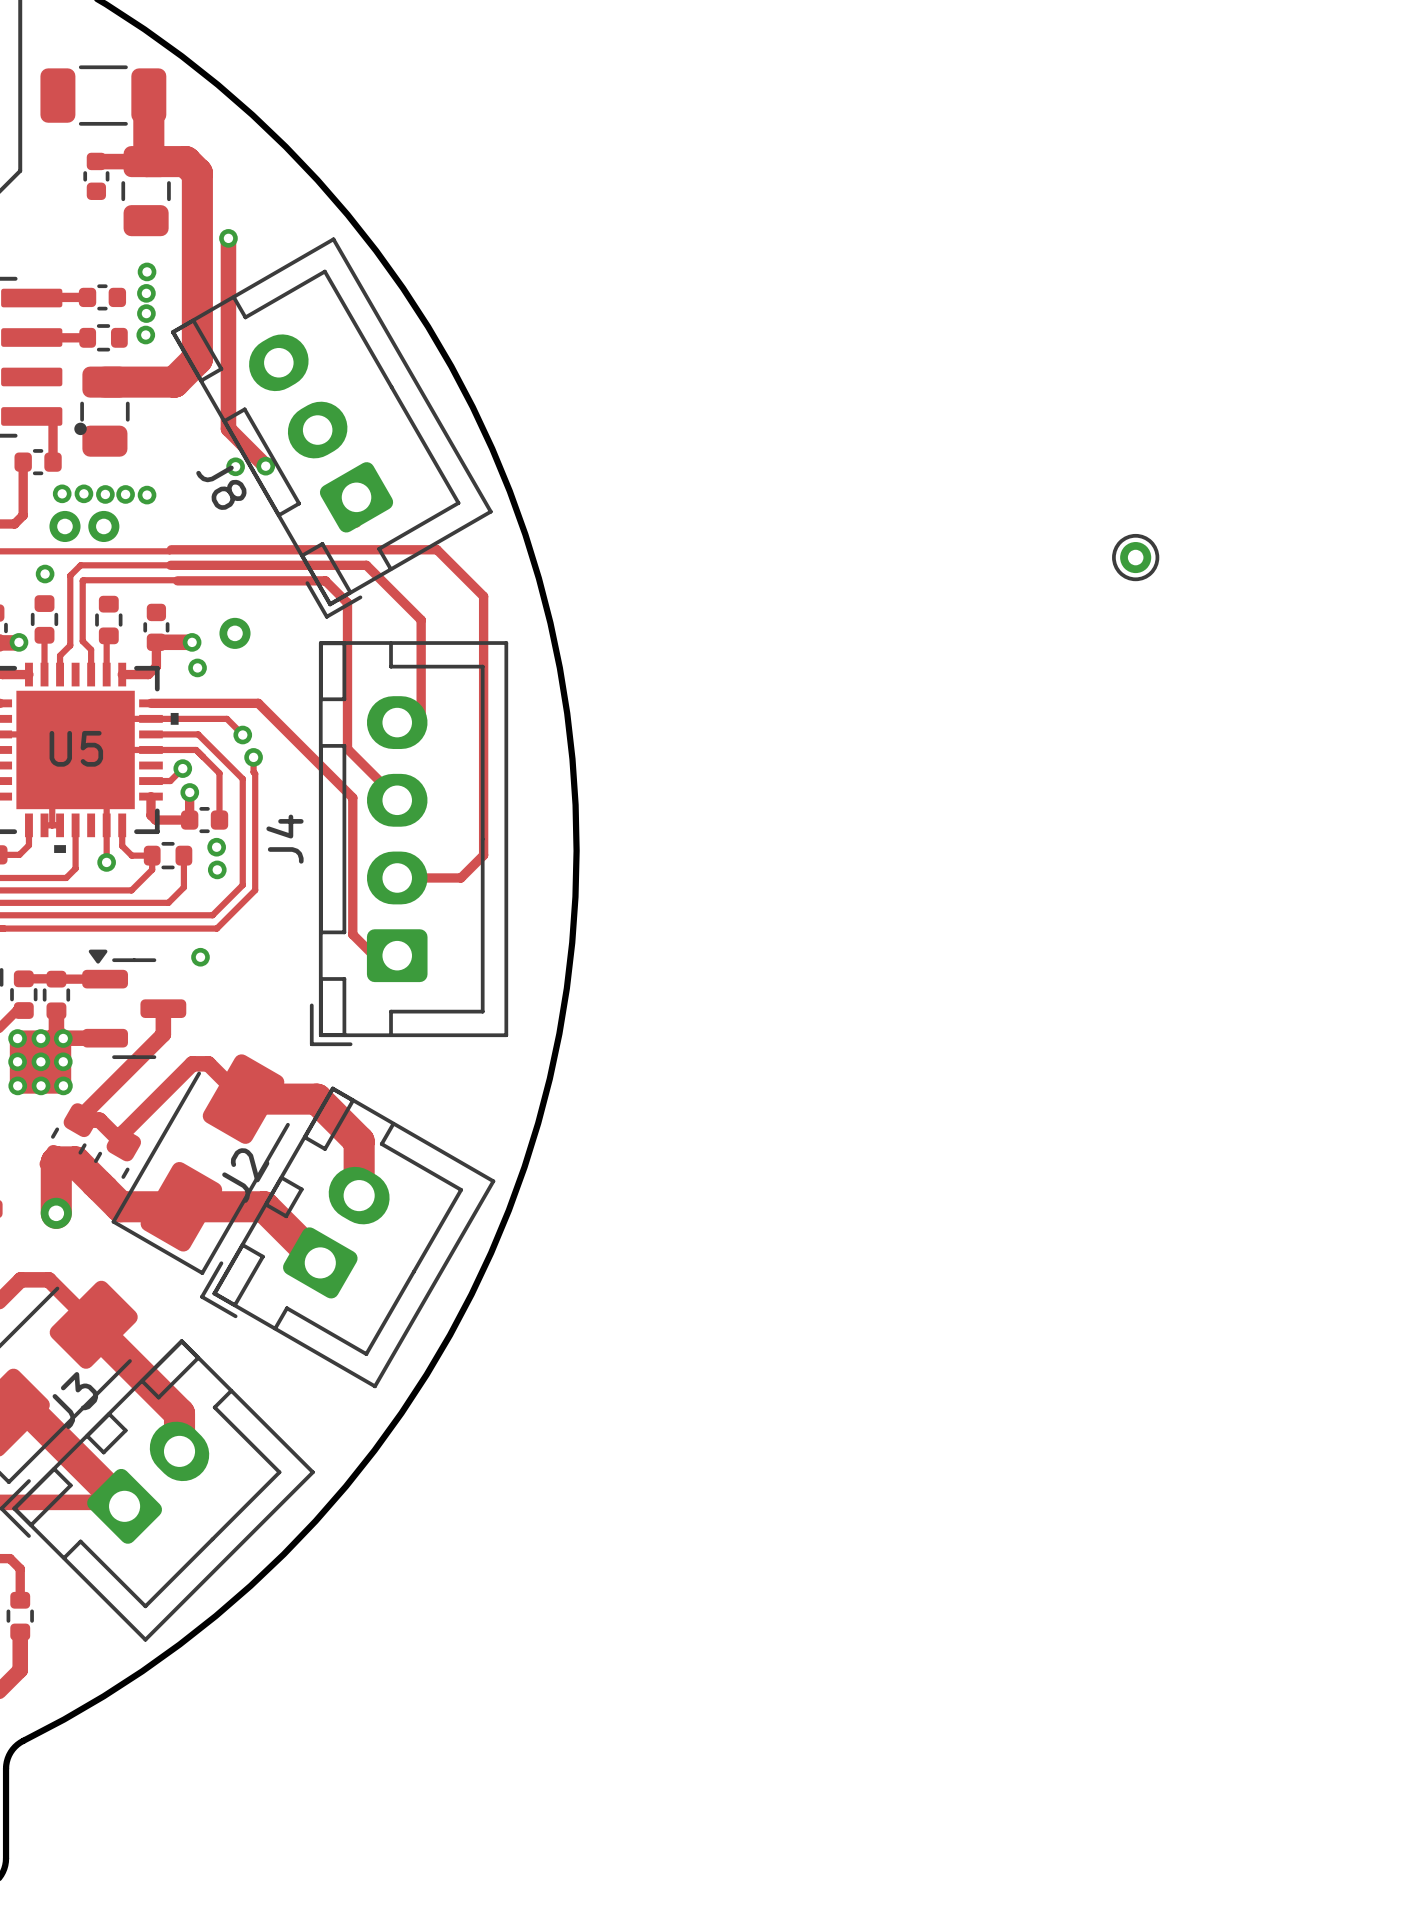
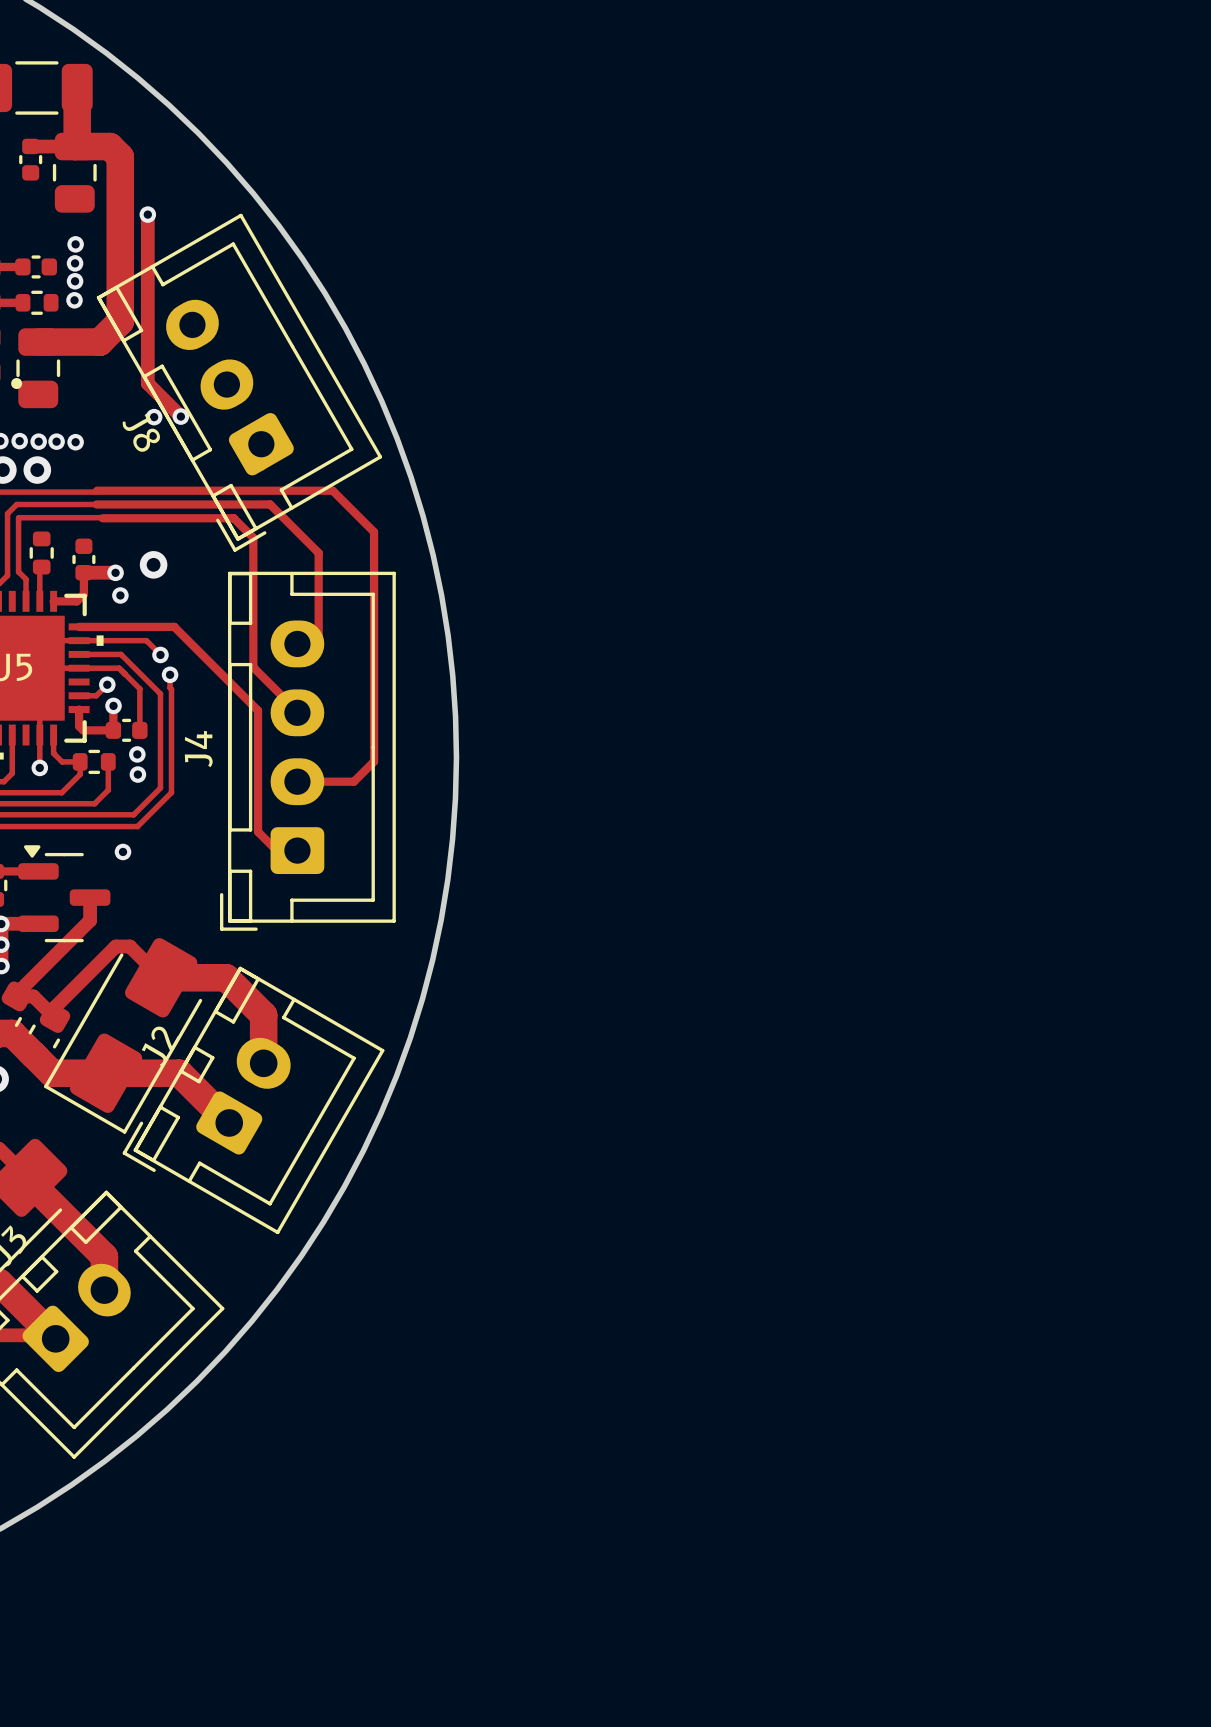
part: (1135, 557) -> none

